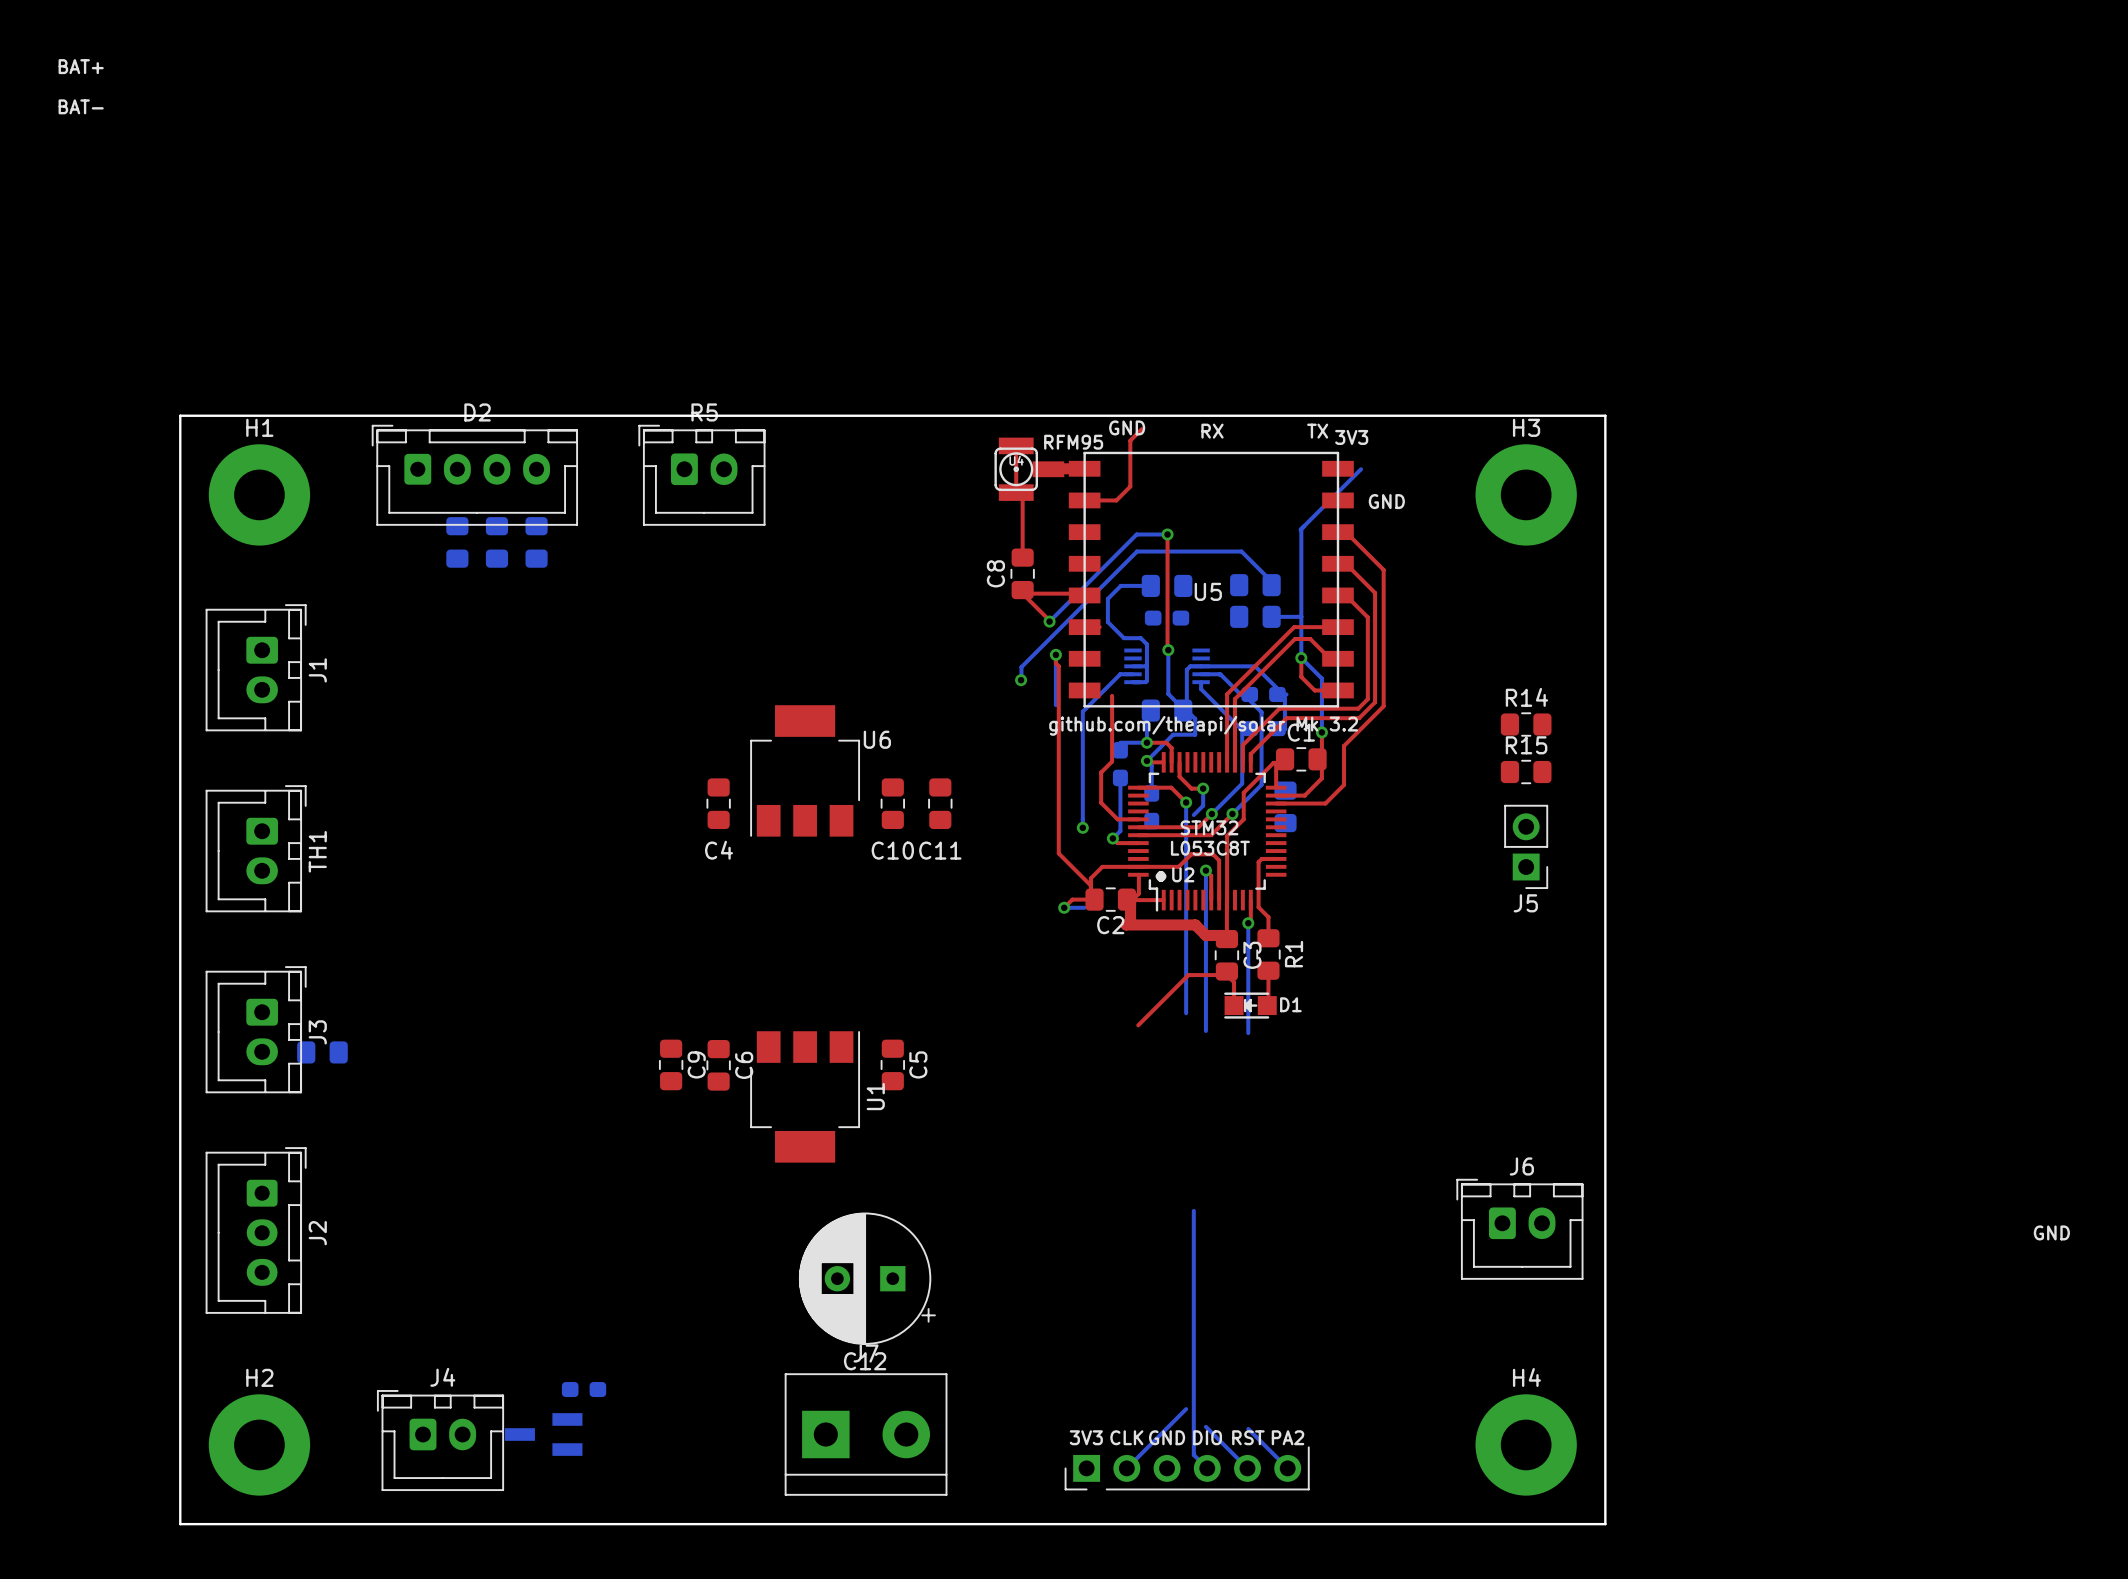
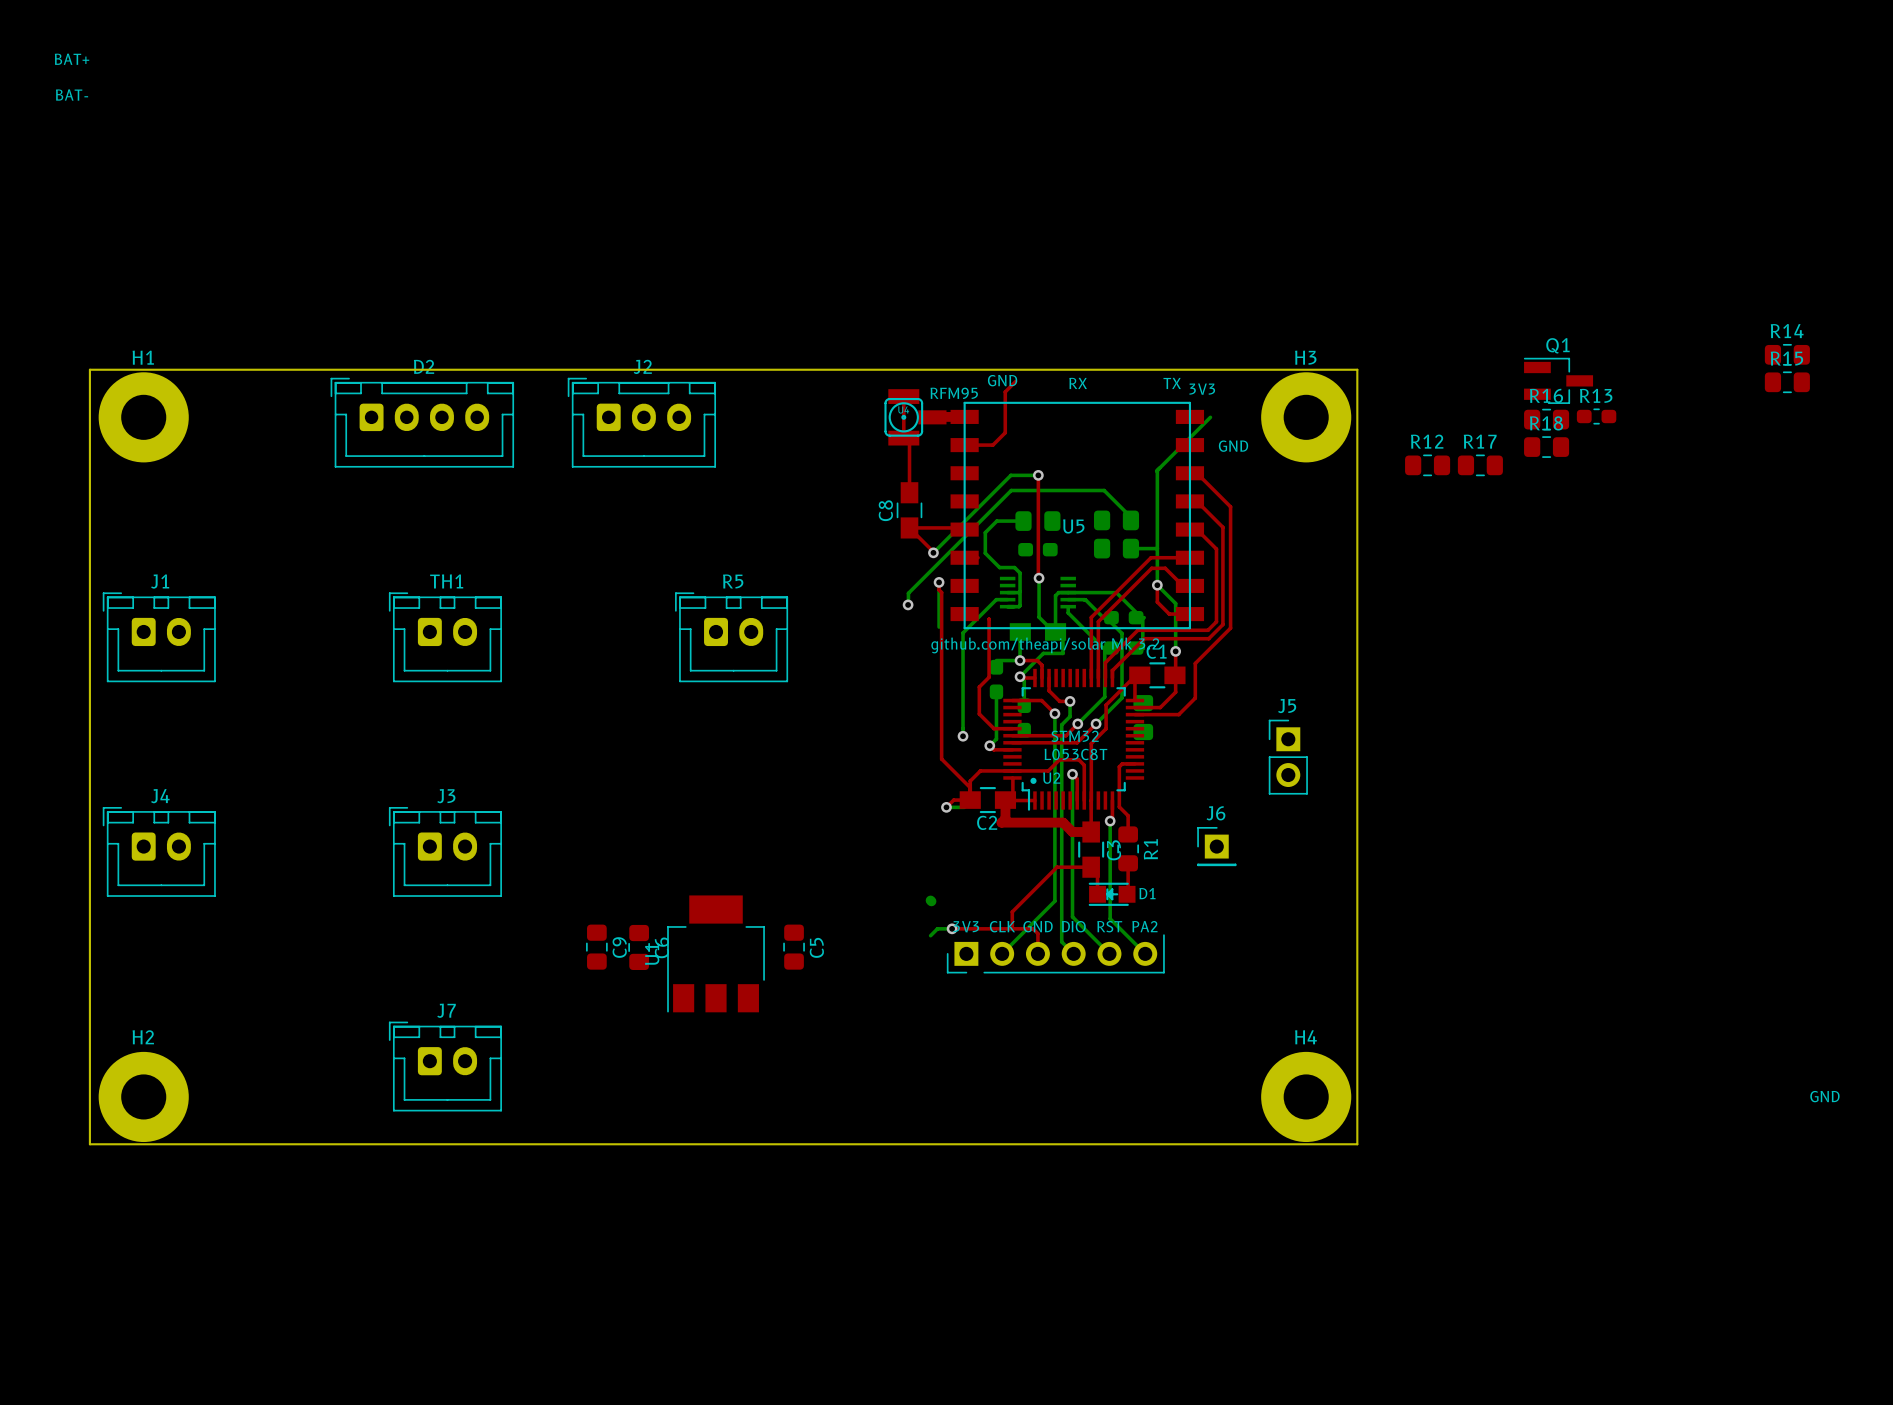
board edge: (180, 415) (180, 1524) (1605, 1524) (1605, 415) (1526, 415) -> (160, 369) (89, 369) (89, 1144) (1357, 1144) (1357, 369)
Q1: none -> (1558, 380)
R13: none -> (1596, 416)
R16: none -> (1546, 419)
R5 position: (701, 475) -> (731, 637)
H1 position: (259, 494) -> (143, 417)
H3 position: (1526, 494) -> (1306, 417)
R18: none -> (1546, 447)
R12: none -> (1427, 465)
R17: none -> (1480, 465)
part: (457, 542) -> none
part: (496, 542) -> none
part: (536, 542) -> none
C8 footprint: [1010, 548, 1035, 600] -> [896, 482, 923, 539]
J1 rotation: 0° (256, 667) -> 90° counterclockwise (159, 637)
J1 position: (256, 667) -> (159, 637)
part footprint: [1141, 699, 1193, 722] -> [1009, 623, 1067, 641]
R14 position: (1526, 724) -> (1787, 354)
C1 footprint: [1276, 747, 1327, 772] -> [1129, 662, 1186, 689]
U6: (805, 770) -> none
R15 position: (1526, 772) -> (1787, 382)
C4: (718, 803) -> none
C10: (892, 803) -> none
C11: (940, 803) -> none
bottom track: none -> (1061, 724) (1061, 941) (1073, 953)
J5 rotation: 0° (1526, 846) -> 180° (1288, 757)
J5 position: (1526, 846) -> (1288, 757)
TH1 rotation: 0° (256, 848) -> 90° counterclockwise (445, 637)
TH1 position: (256, 848) -> (445, 637)
C2 footprint: [1085, 887, 1137, 912] -> [959, 787, 1017, 814]
C3 footprint: [1214, 929, 1240, 981] -> [1078, 821, 1105, 878]
bottom track: none -> (930, 900) (931, 901)
bottom track: none -> (1054, 901) (1002, 953)
top track: none -> (1012, 911) (1012, 928)
J3 rotation: 0° (256, 1029) -> 90° counterclockwise (445, 851)
J3 position: (256, 1029) -> (445, 851)
bottom track: none -> (1072, 916) (1109, 953)
bottom track: none -> (1110, 918) (1145, 953)
top track: none -> (952, 928) (1033, 928) (1037, 933) (1037, 953)
bottom track: none -> (952, 928) (937, 928) (930, 935)
via: none -> (952, 928)
part: (322, 1052) -> none
U1 rotation: 0° (805, 1096) -> 180° (716, 953)
J6 footprint: [1456, 1178, 1584, 1280] -> [1197, 827, 1237, 867]
bottom track: (1193, 1210) (1193, 1454) (1207, 1468) -> none
J2 rotation: 0° (256, 1230) -> 90° counterclockwise (641, 422)
J2 position: (256, 1230) -> (641, 422)
C12: (867, 1278) -> none
J7 footprint: [784, 1373, 948, 1496] -> [388, 1021, 502, 1112]
part: (584, 1389) -> none
bottom track: (1186, 1409) (1126, 1468) -> none
bottom track: (1205, 1426) (1247, 1468) -> none
bottom track: (1248, 1428) (1287, 1468) -> none
part: (543, 1434) -> none
text position: 3V3 (1086, 1437) -> 3V3 (966, 926)
text position: CLK (1126, 1437) -> CLK (1002, 926)
text position: GND (1167, 1437) -> GND (1038, 926)
text position: DIO (1207, 1437) -> DIO (1073, 926)
text position: RST (1248, 1437) -> RST (1109, 926)
text position: PA2 (1288, 1437) -> PA2 (1144, 926)
J4 position: (440, 1440) -> (159, 851)
H2 position: (259, 1444) -> (143, 1096)
H4 position: (1526, 1444) -> (1306, 1096)
part position: (1187, 1468) -> (1055, 953)

